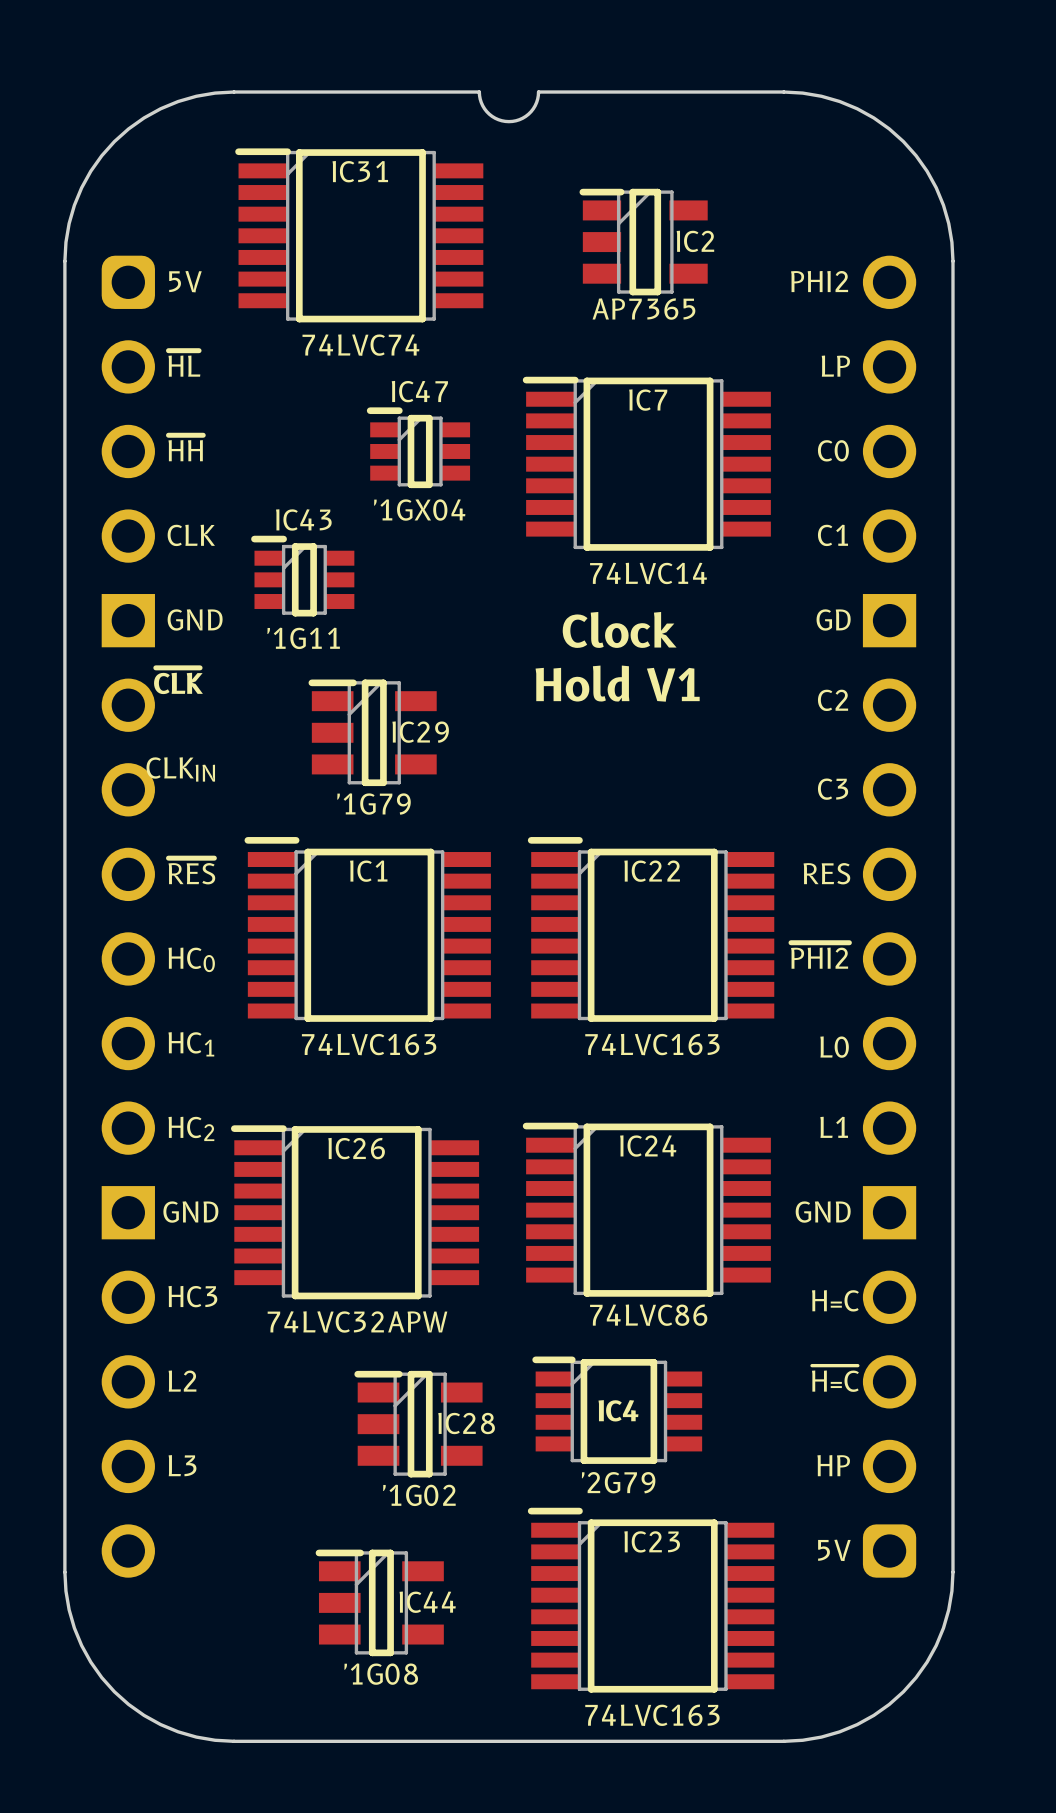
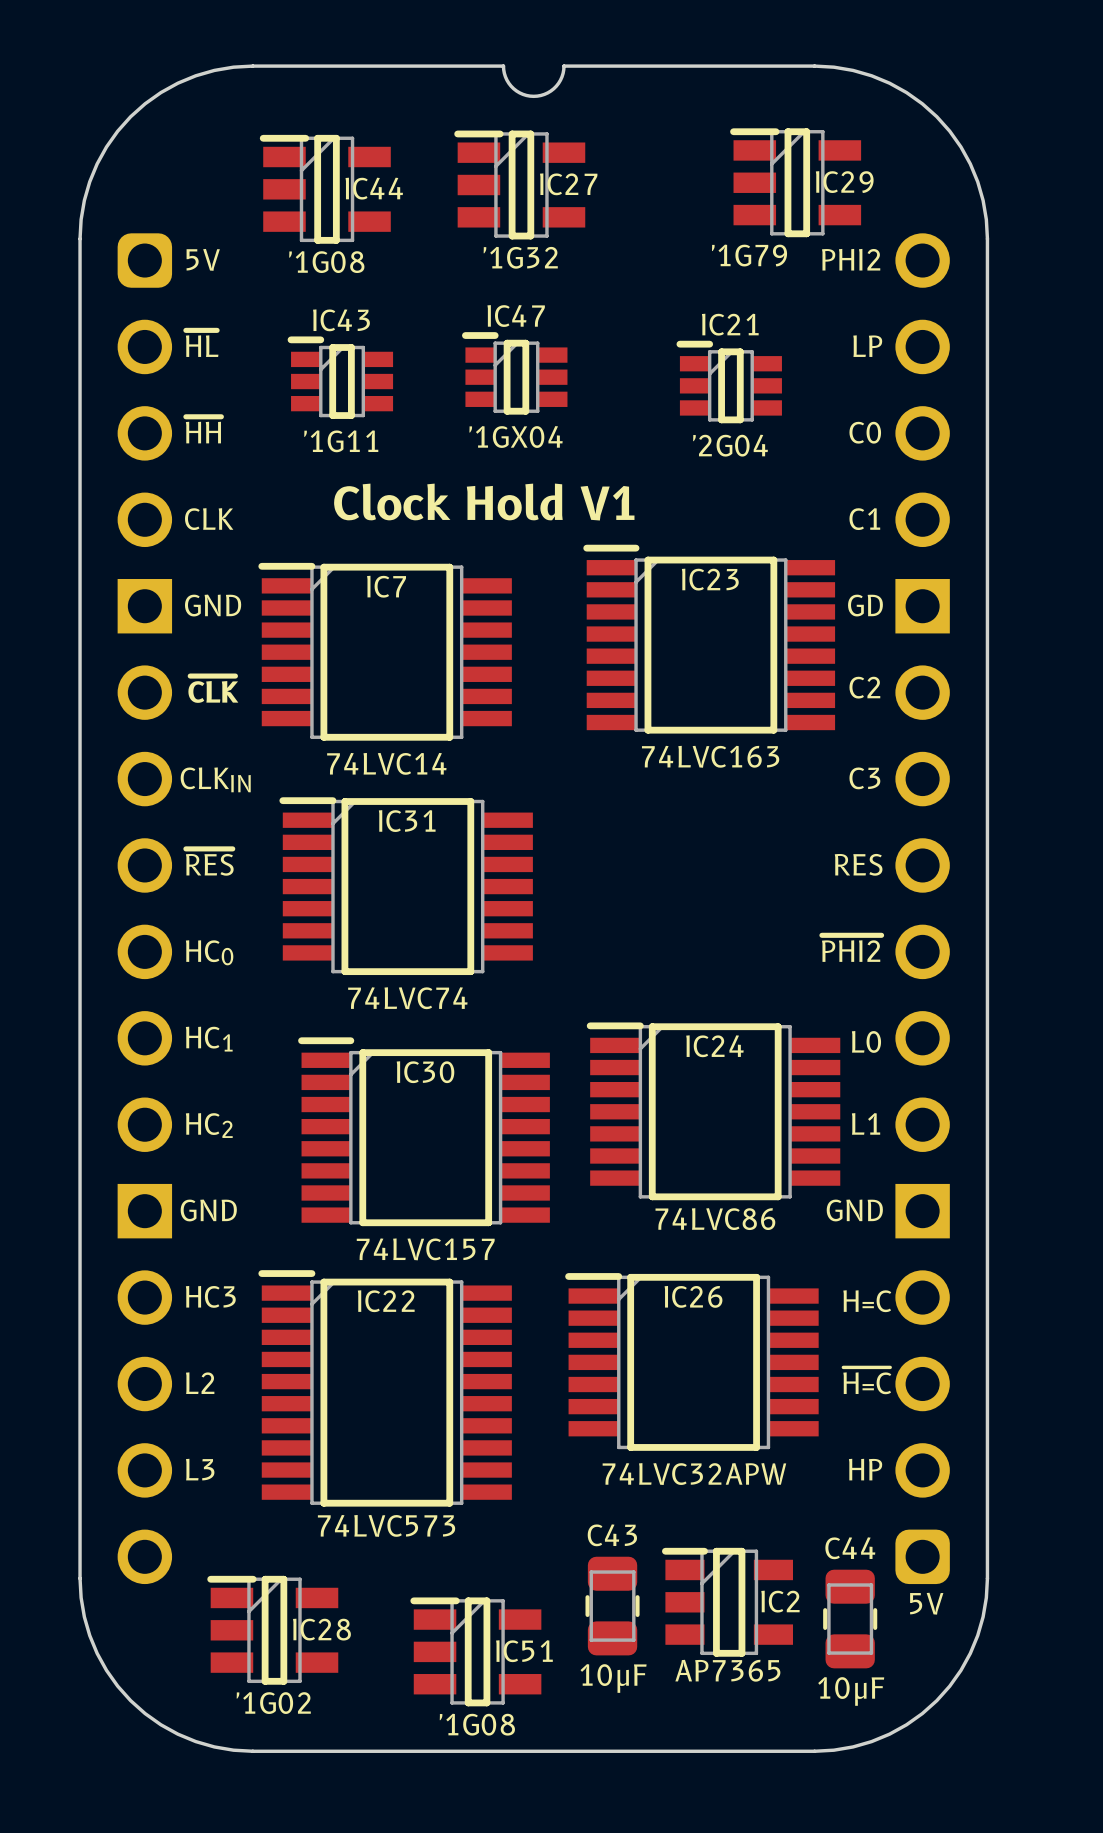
IC27: none -> (519, 185)
IC31 position: (359, 235) -> (406, 886)
IC2 position: (643, 242) -> (727, 1602)
IC21: none -> (729, 382)
IC47 position: (418, 447) -> (514, 373)
IC7 position: (646, 463) -> (385, 651)
text: none -> Clock Hold V1 (484, 502)
IC43 position: (302, 576) -> (340, 377)
text: Clock (619, 629) -> none
text position: ~{CLK} (178, 680) -> ~{CLK} (213, 689)
text: Hold V1 (617, 683) -> none
IC29 position: (372, 732) -> (795, 182)
text position: CLKIN (180, 769) -> CLKIN (215, 779)
IC29 text position: '1G79 (374, 804) -> '1G79 (749, 255)
IC22 footprint: [527, 837, 775, 1022] -> [258, 1270, 512, 1507]
IC1: (367, 929) -> none
IC30: none -> (424, 1131)
IC24 position: (646, 1209) -> (713, 1111)
IC26 position: (355, 1212) -> (691, 1361)
IC4: (617, 1410) -> none
IC28 position: (418, 1424) -> (272, 1630)
text position: 5V (834, 1550) -> 5V (926, 1603)
C43: none -> 10μF (612, 1606)
IC23 position: (651, 1600) -> (709, 639)
IC44 position: (379, 1602) -> (325, 189)
C44: none -> 10μF (850, 1619)
IC51: none -> (475, 1651)

